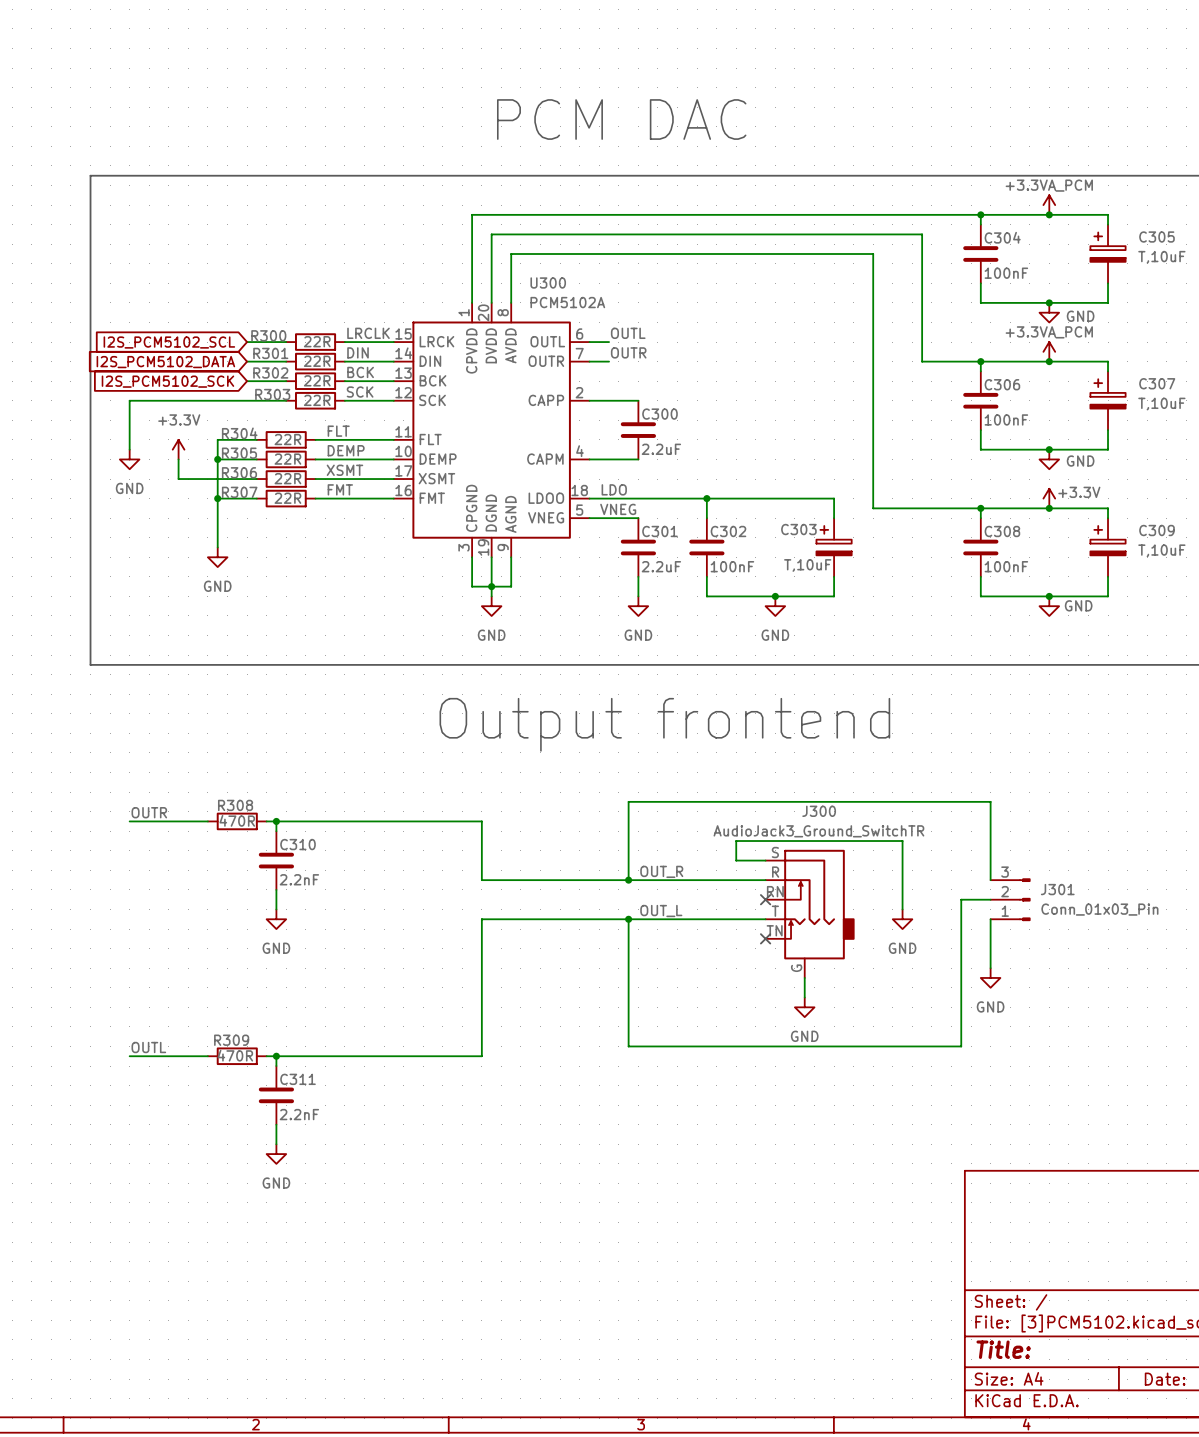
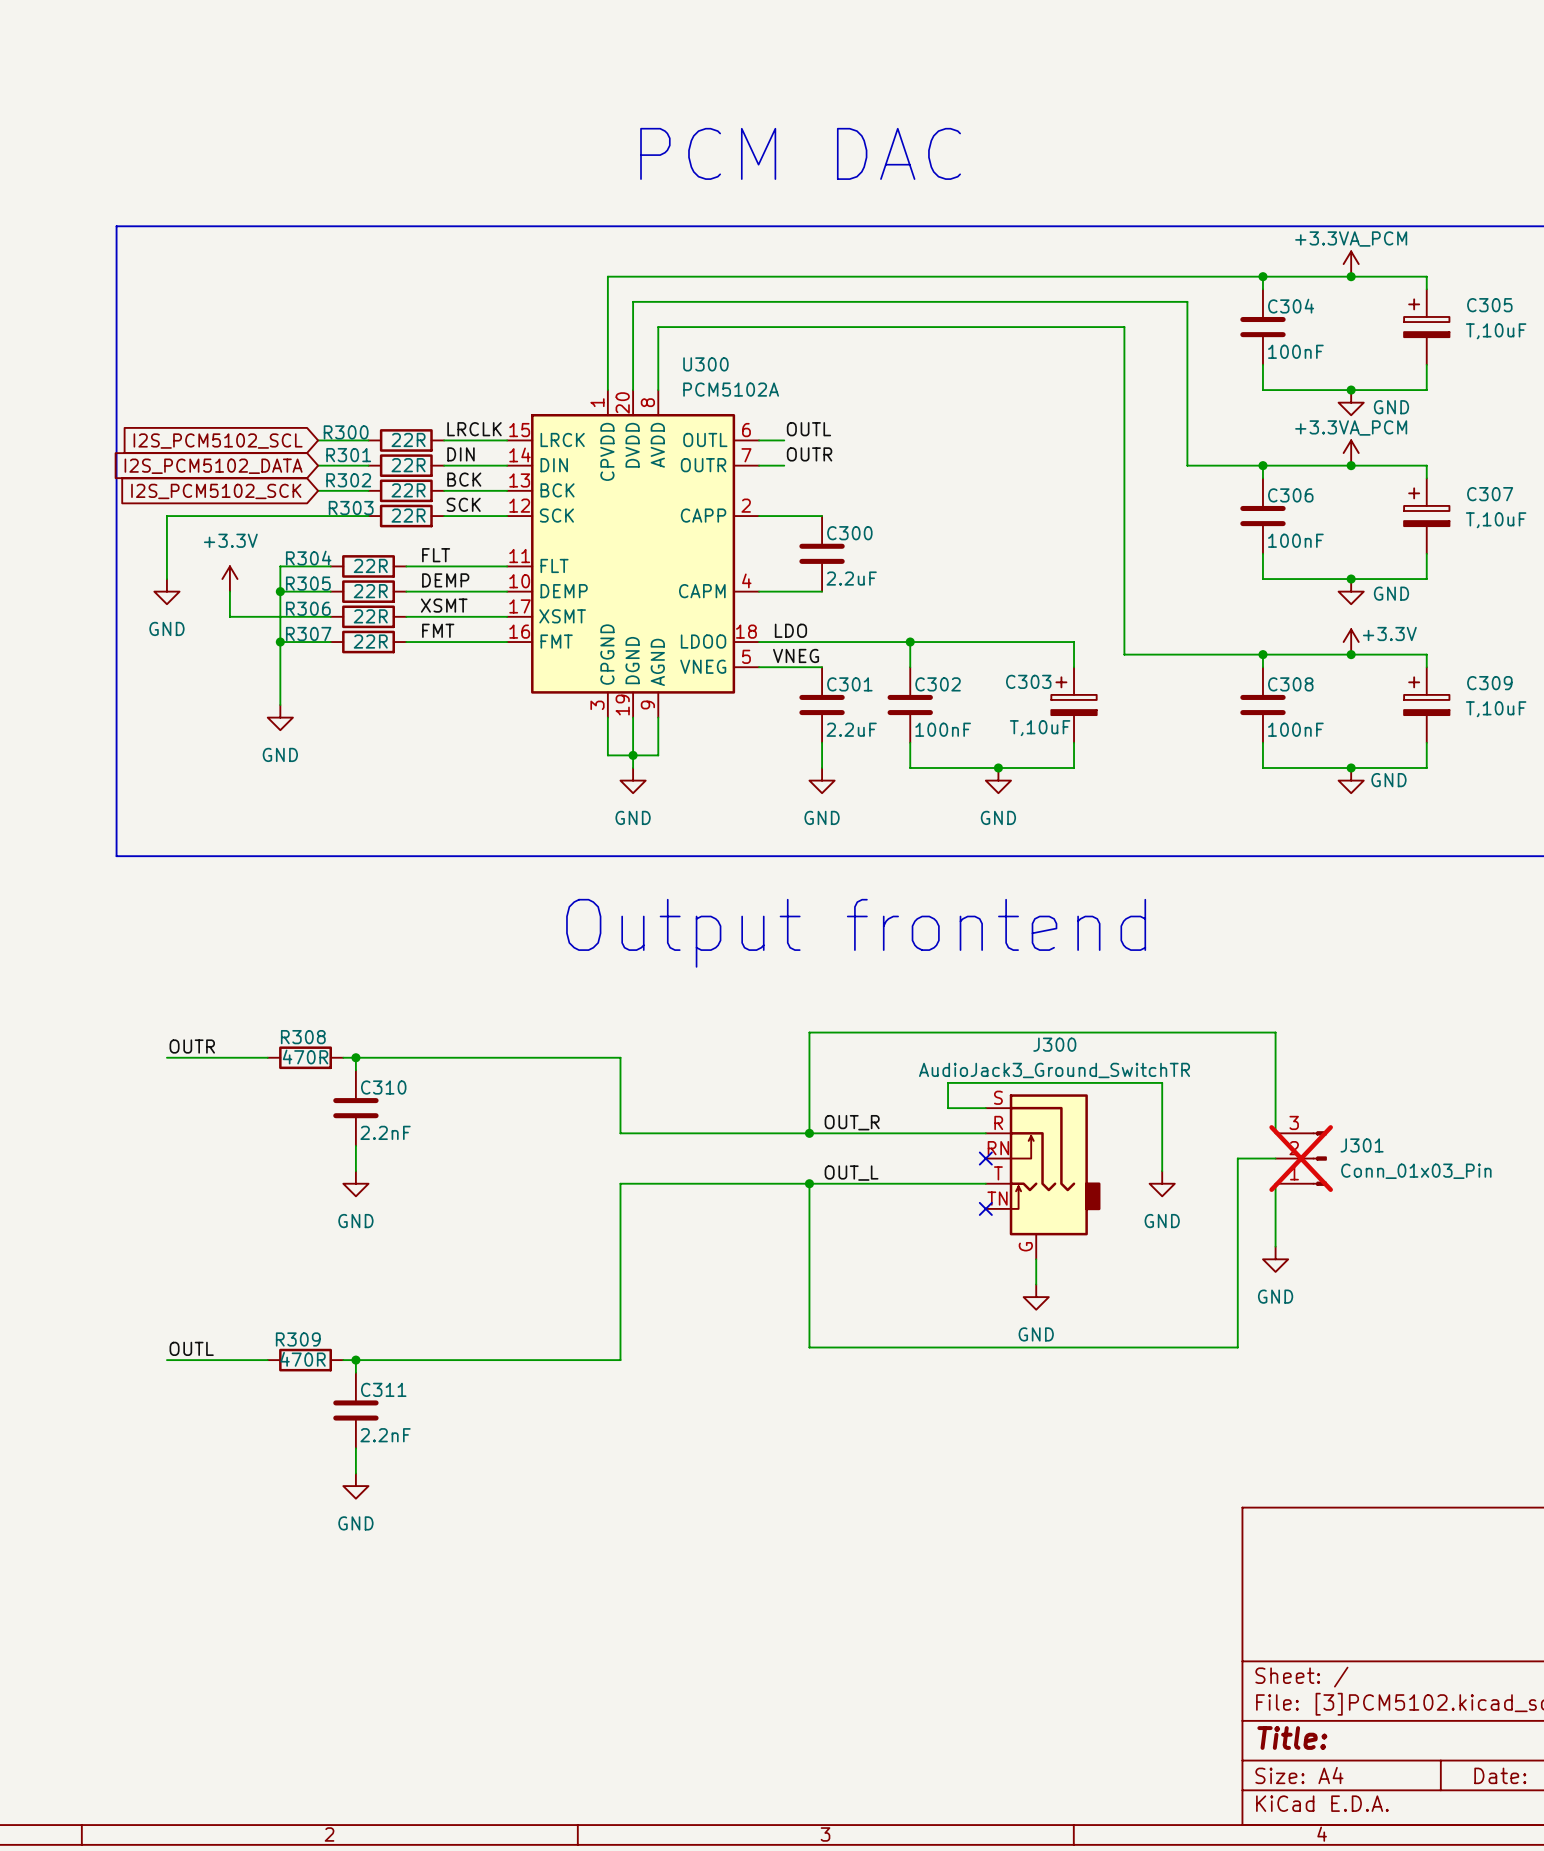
J301 do-not-place cross: none -> (1301, 1158)

